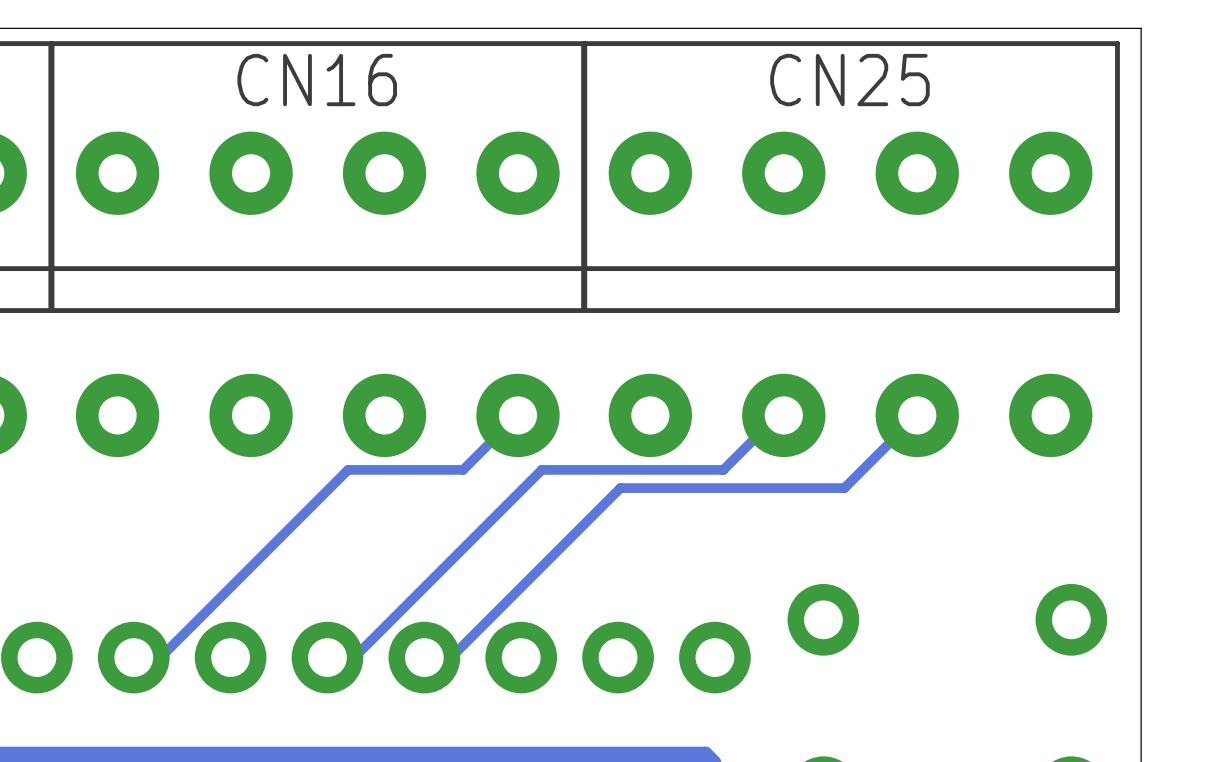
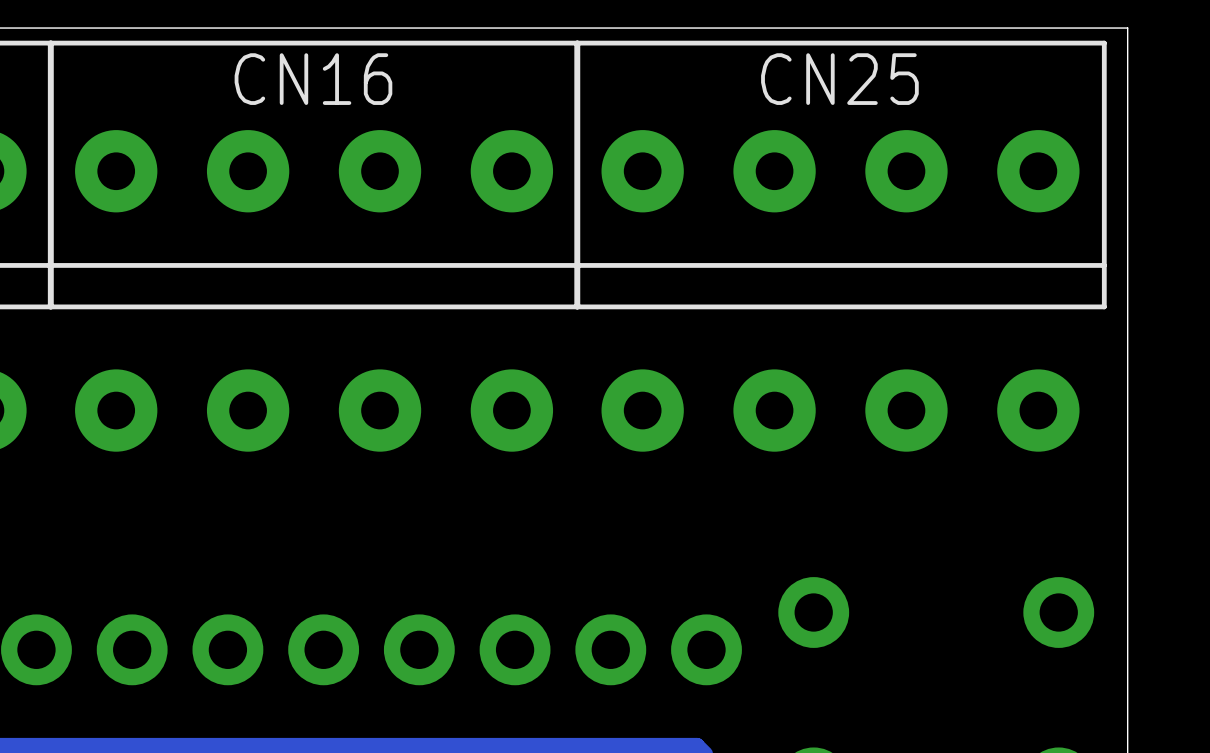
track: (517, 415) (463, 469) (348, 469) (160, 657) (133, 657) -> none
track: (783, 415) (777, 415) (723, 469) (541, 469) (354, 657) (327, 657) -> none
track: (917, 415) (844, 488) (620, 488) (450, 657) (424, 657) -> none

